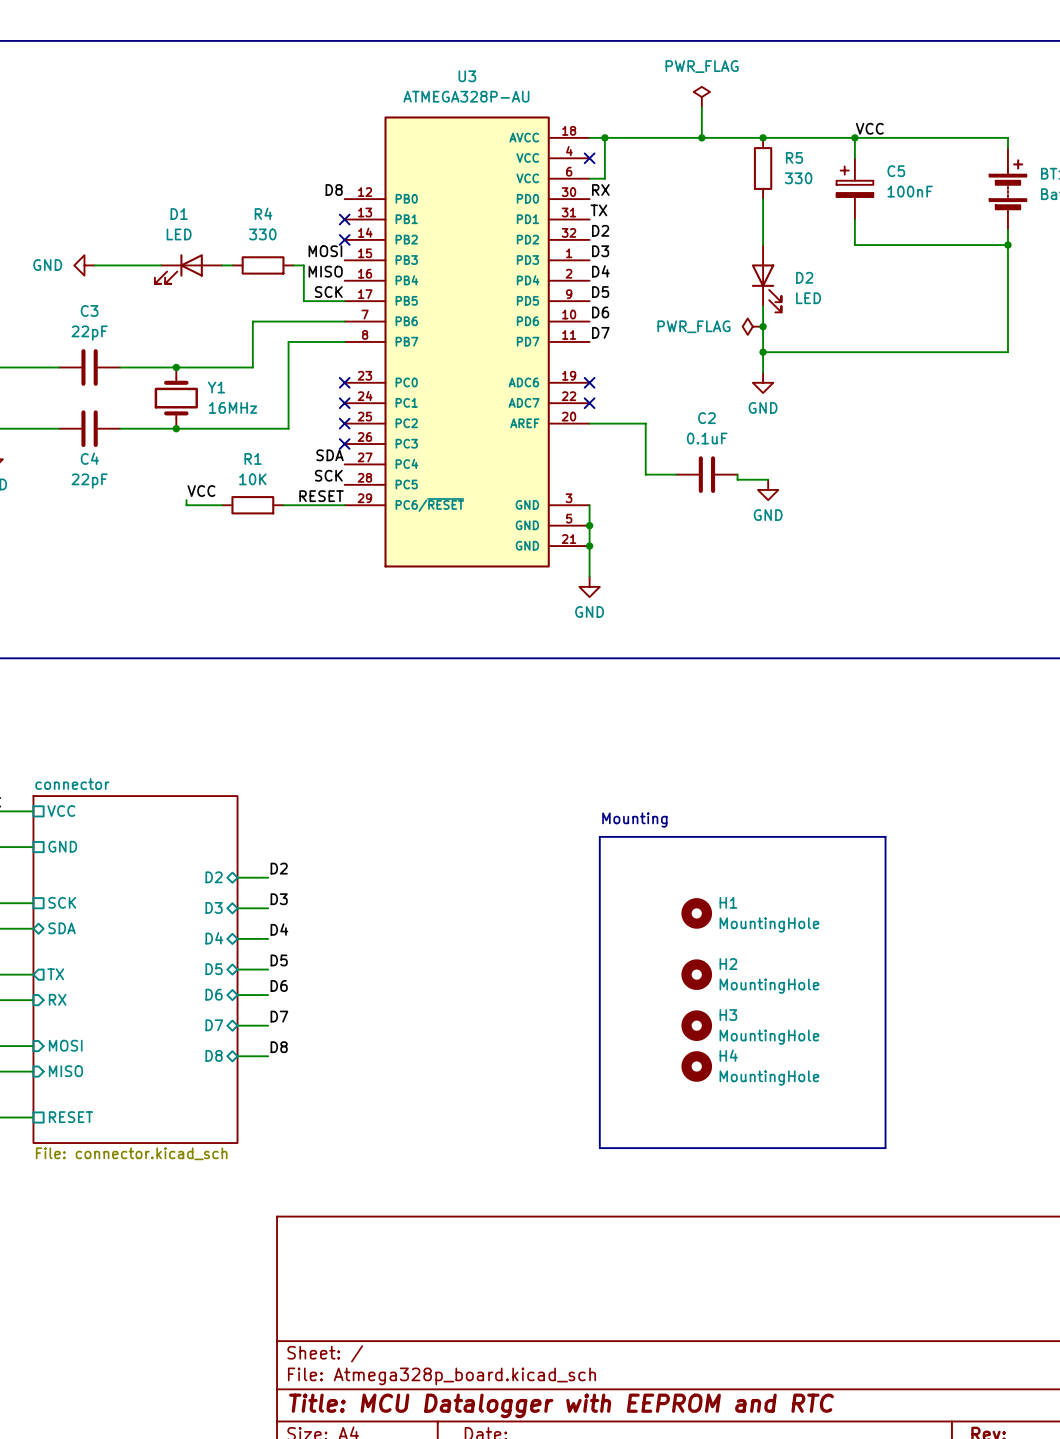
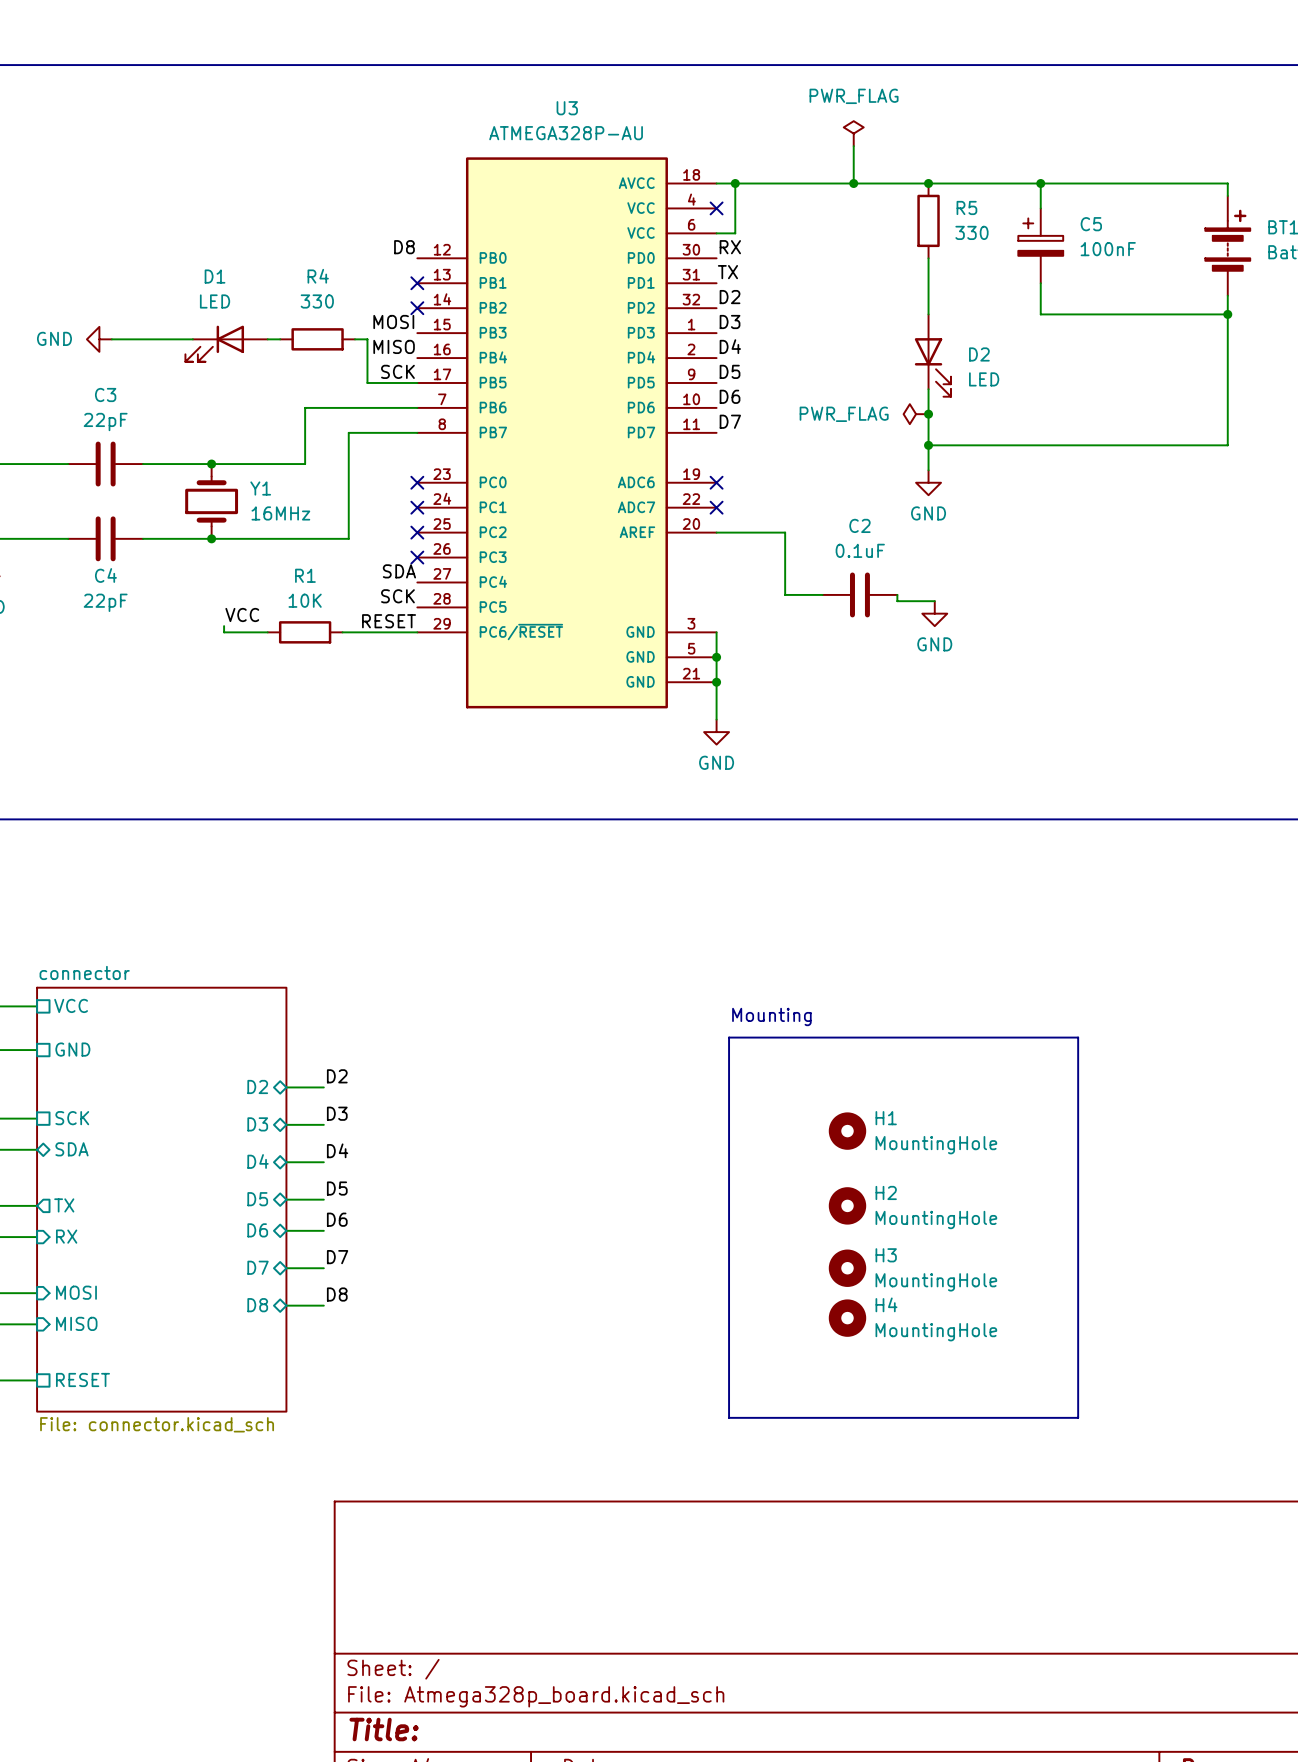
label: VCC (869, 128) -> none
title block: Title: MCU Datalogger with EEPROM and RTC (561, 1405) -> Title: (384, 1729)

